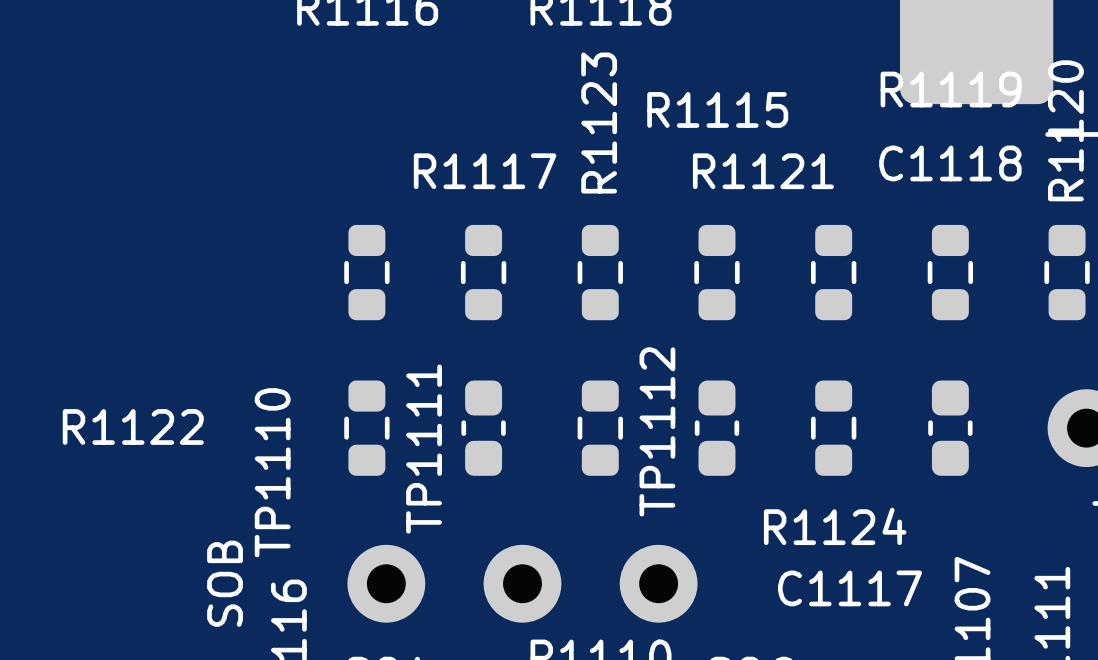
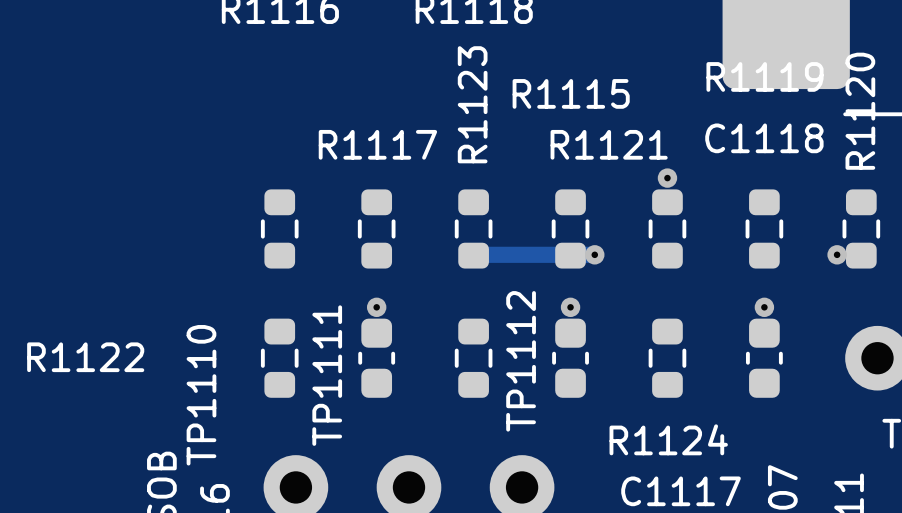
via: none -> (667, 178)
track: none -> (475, 254) (568, 254)
via: none -> (594, 254)
via: none -> (837, 254)
via: none -> (376, 307)
via: none -> (570, 307)
via: none -> (764, 307)

